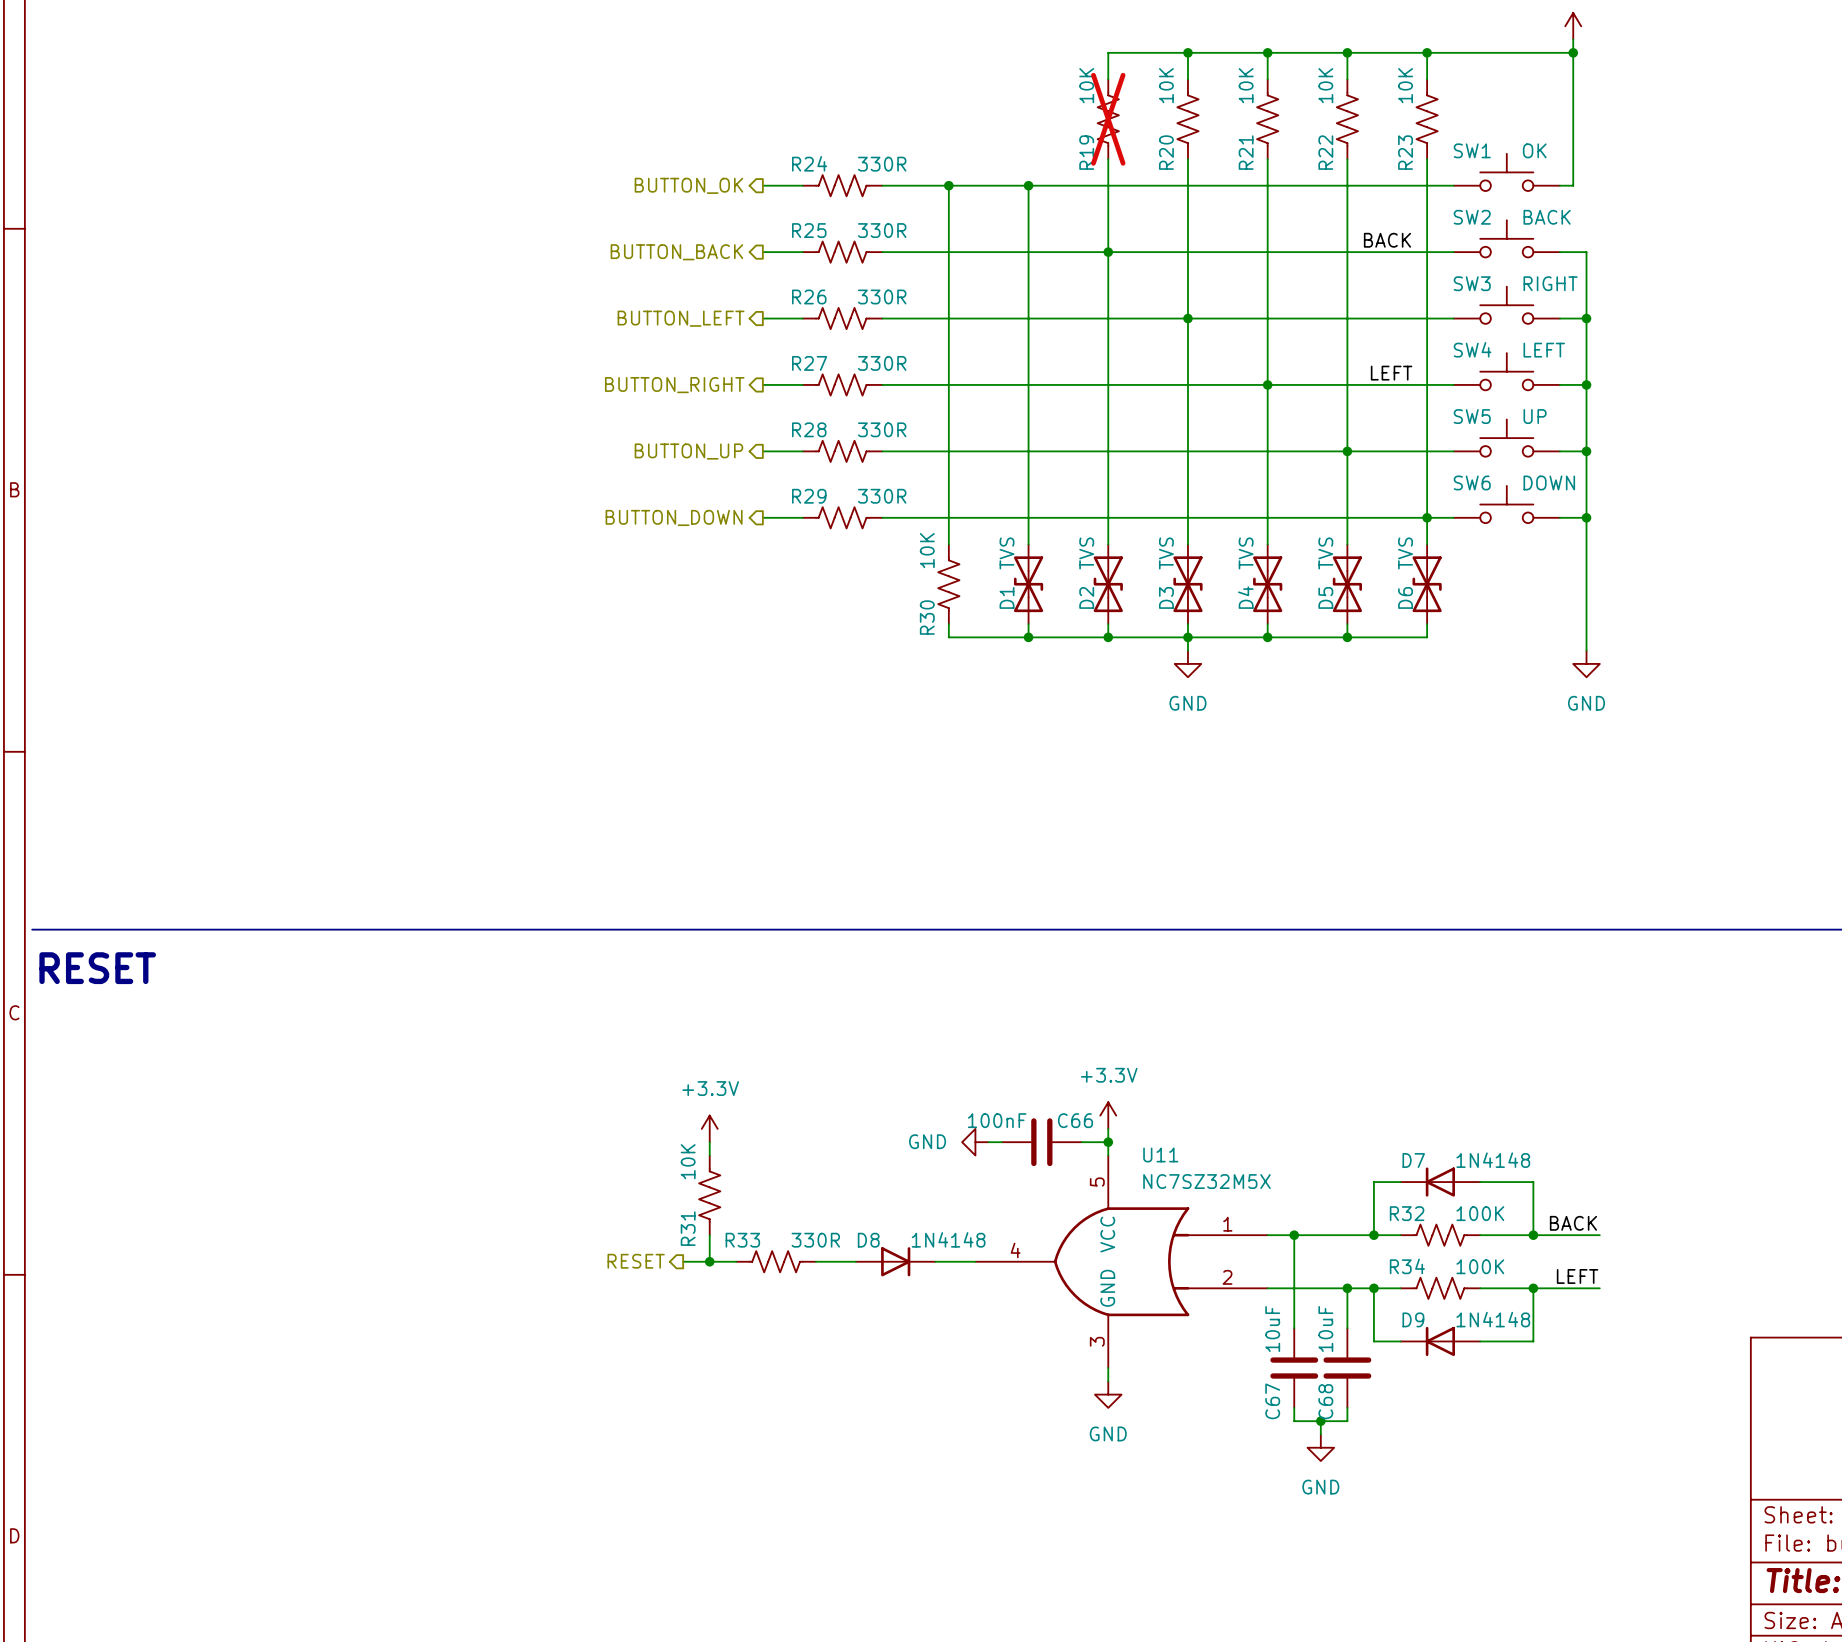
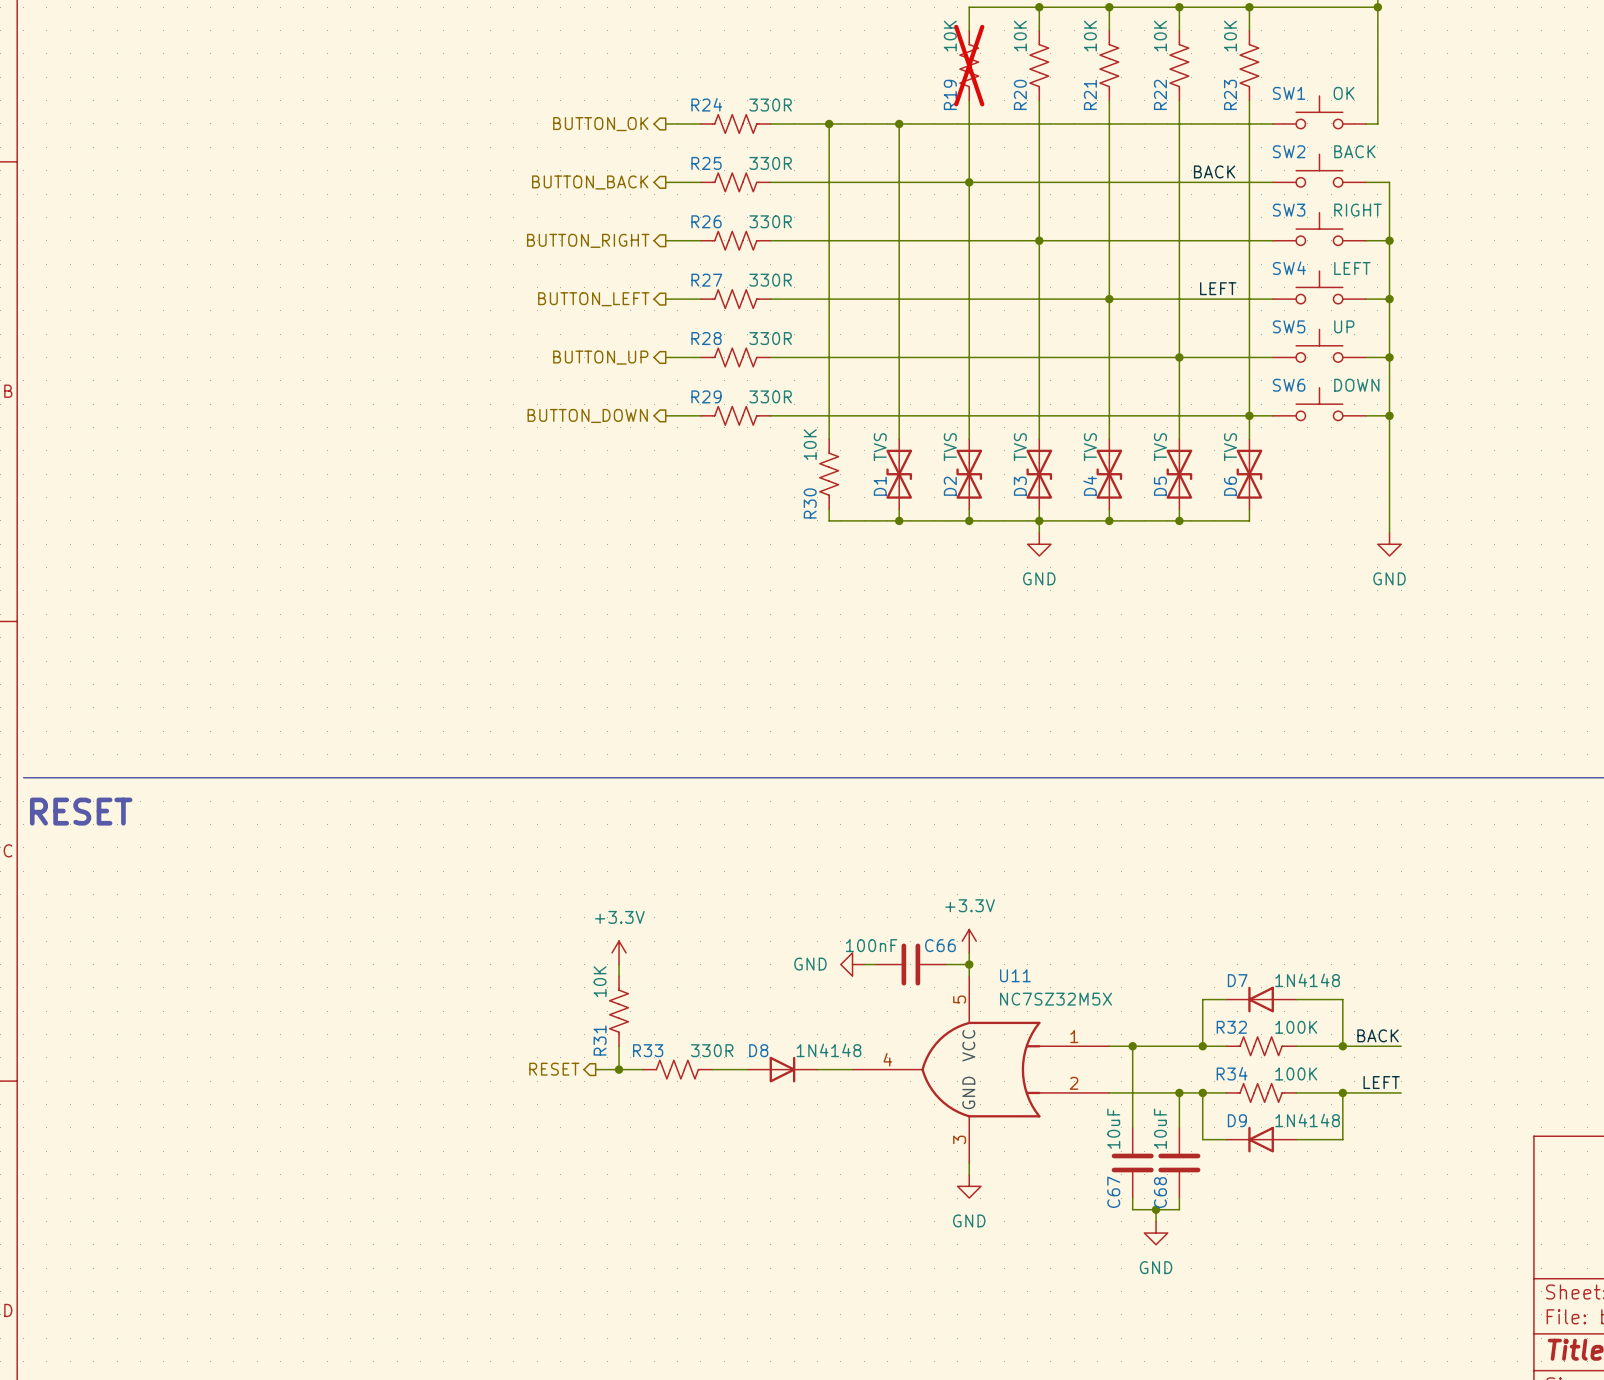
hierarchical label: BUTTON_LEFT (681, 318) -> BUTTON_RIGHT (588, 240)
hierarchical label: BUTTON_RIGHT (674, 385) -> BUTTON_LEFT (593, 299)

